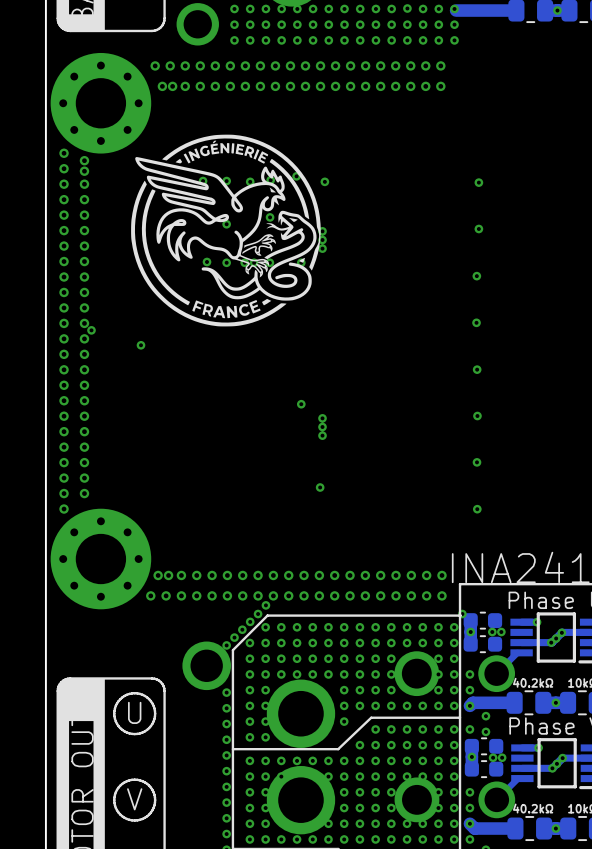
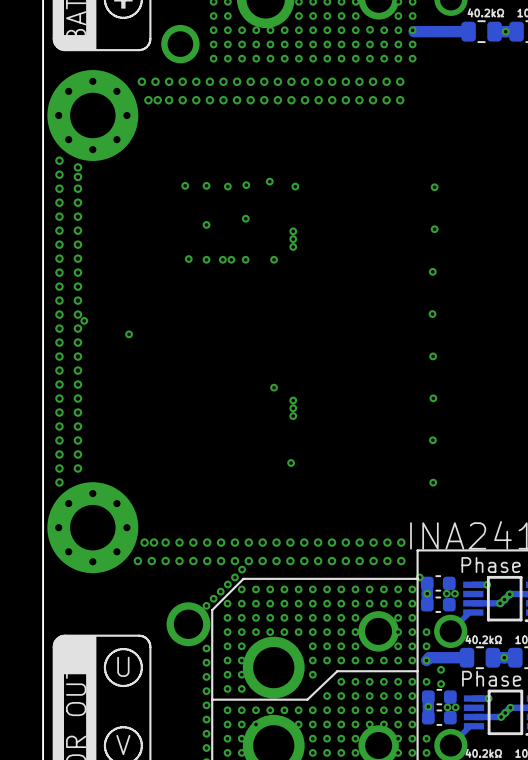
drawing: [131, 134, 321, 327] -> none

